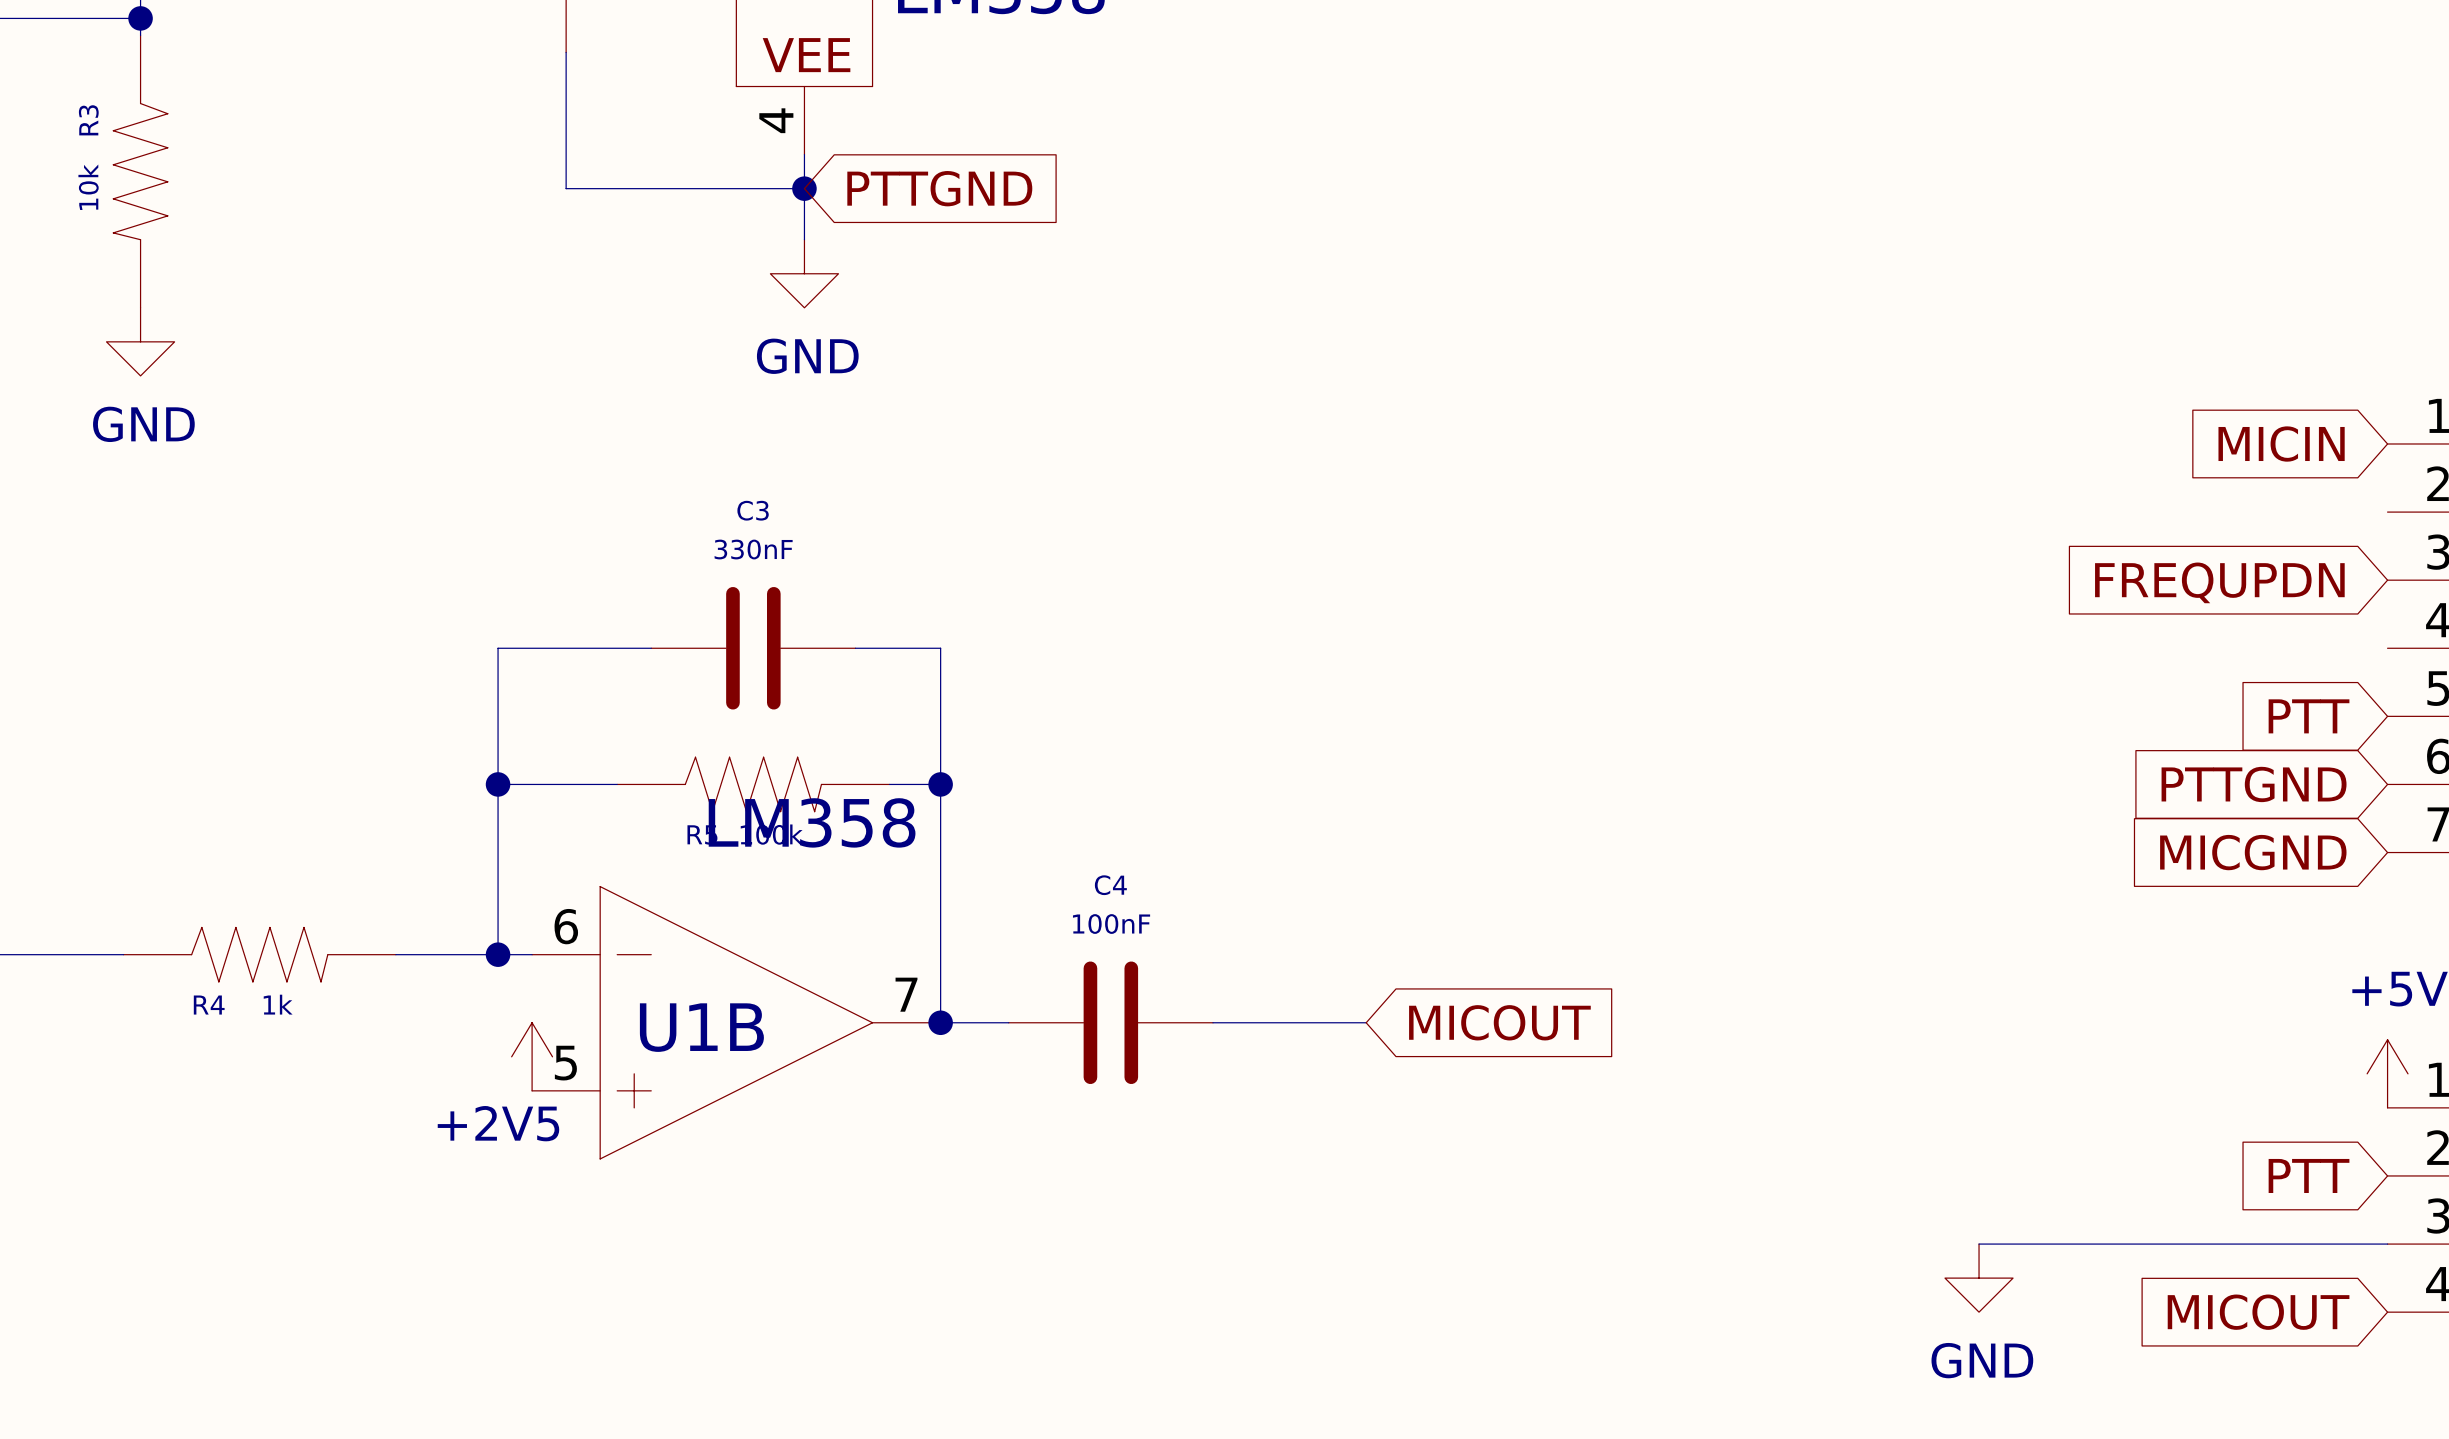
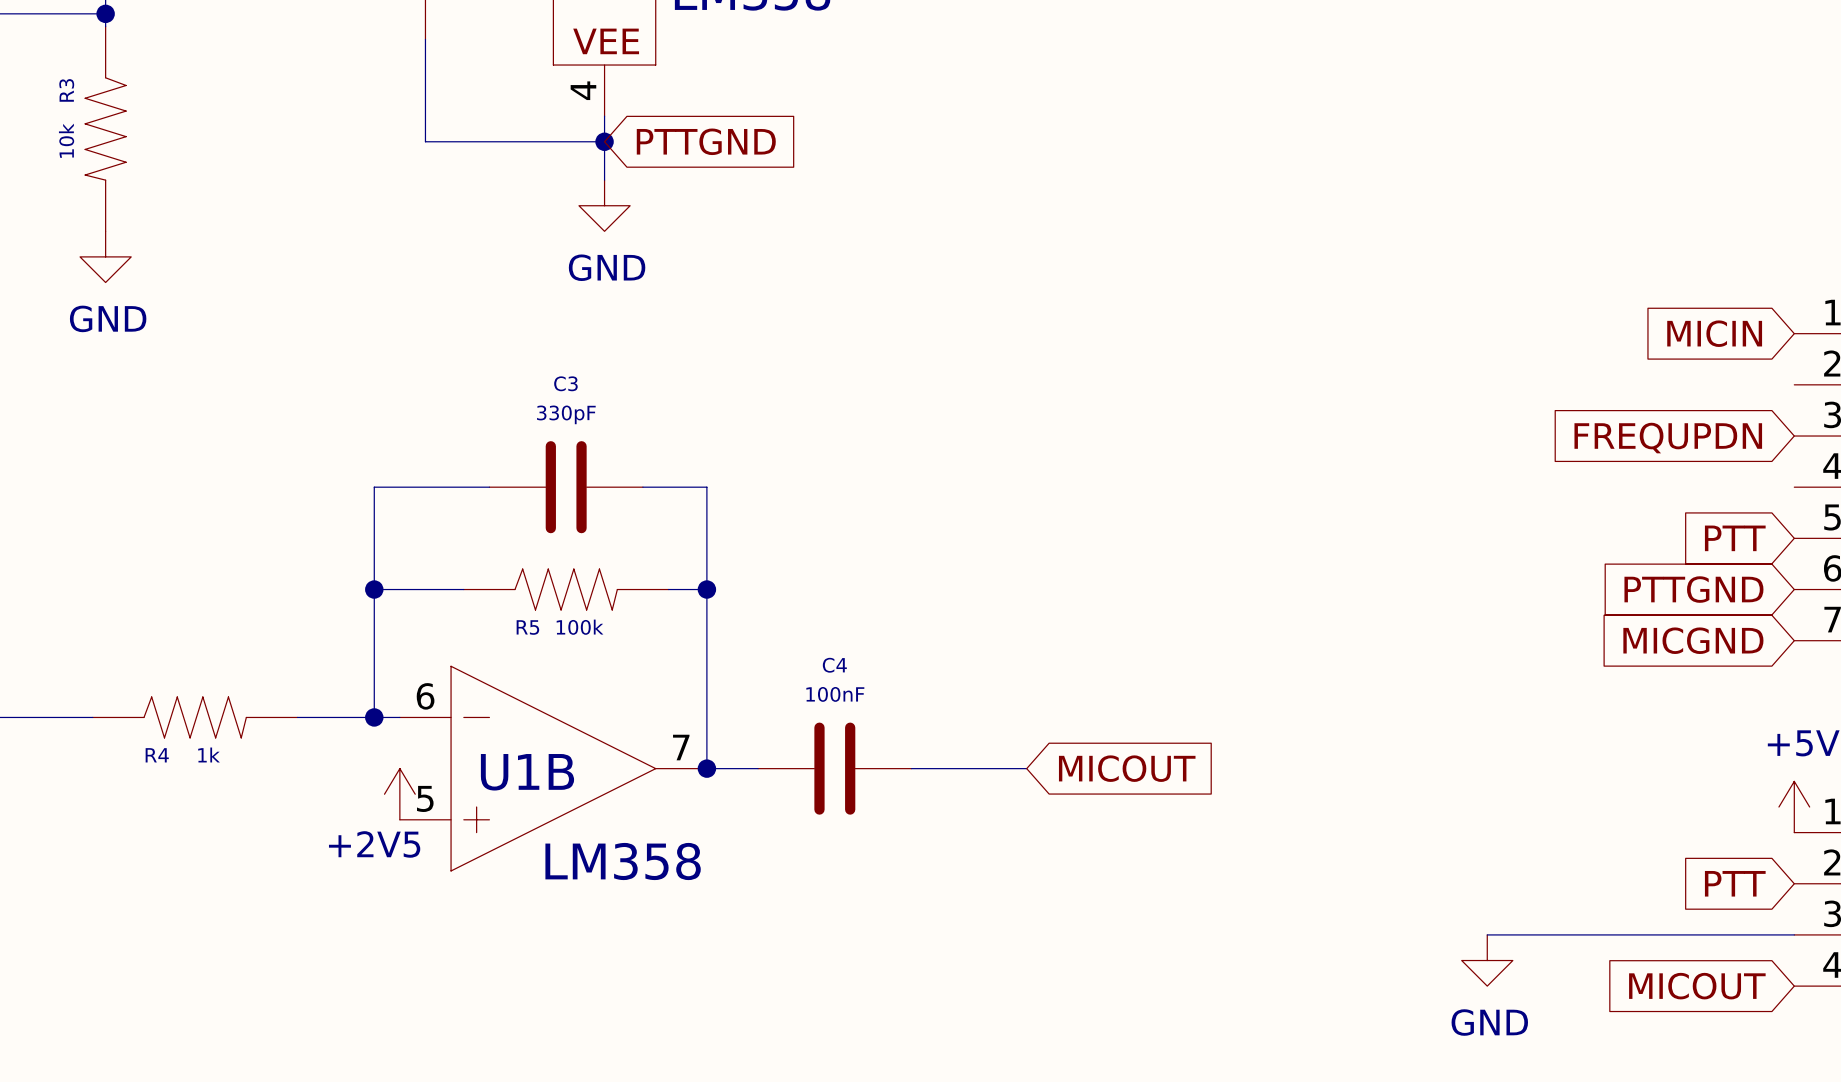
C3 value: 330nF (753, 549) -> 330pF (566, 414)
U1B value position: LM358 (812, 822) -> LM358 (623, 861)

